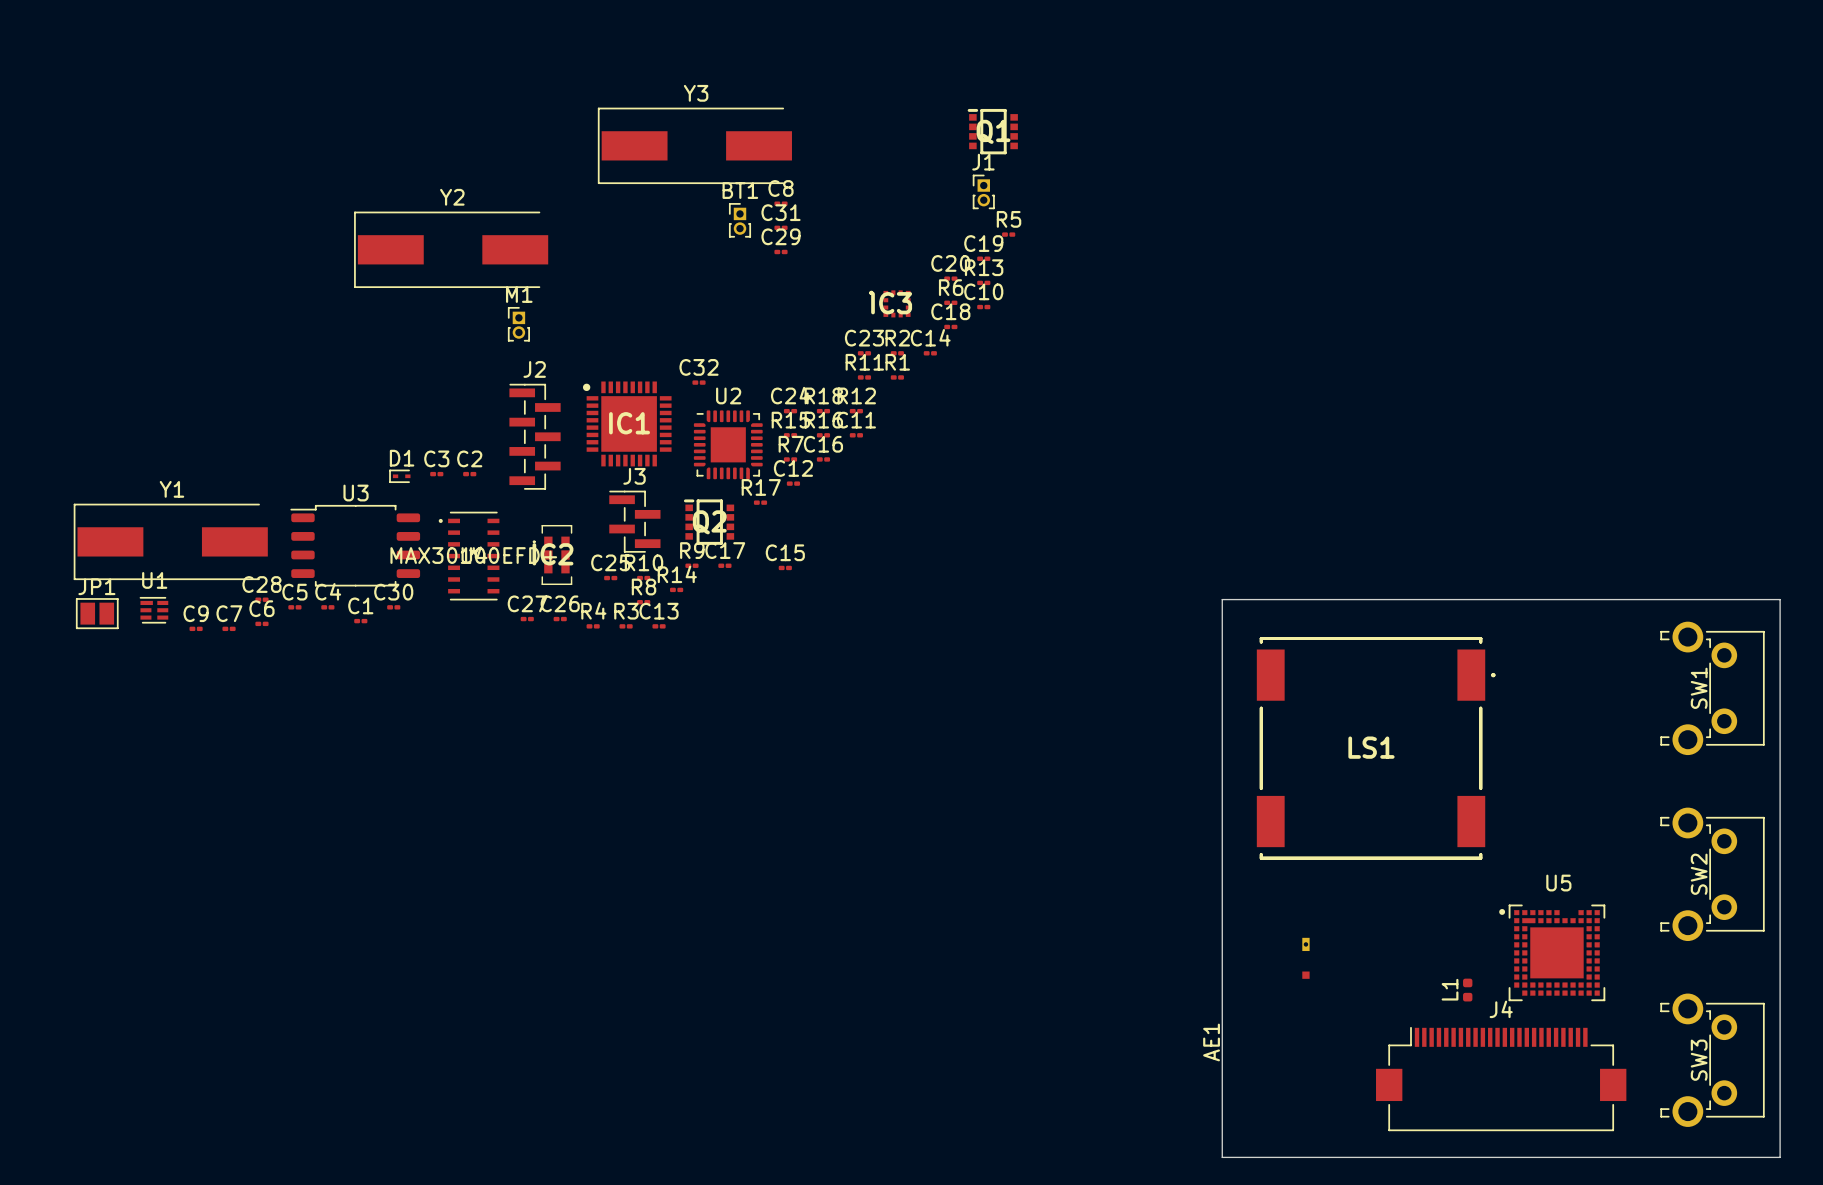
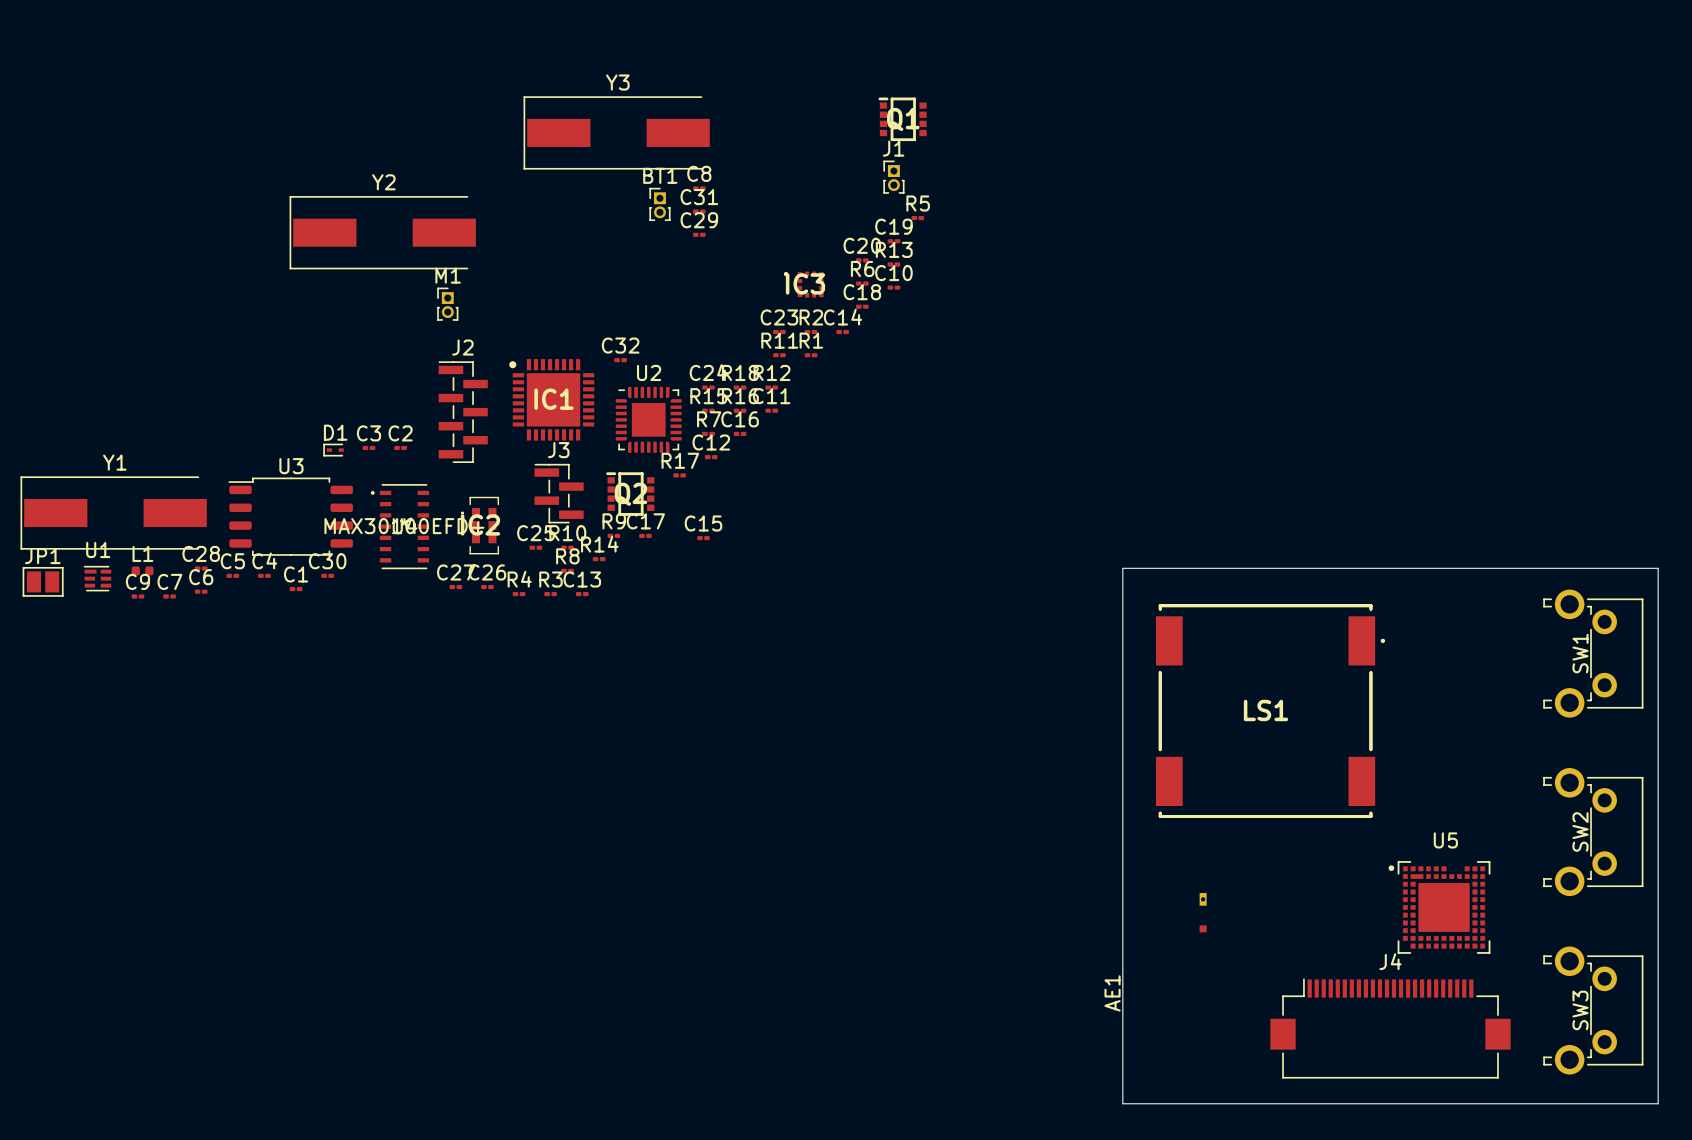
L1 rotation: 0° (1467, 990) -> 90° clockwise (142, 570)
L1 position: (1467, 990) -> (142, 570)

